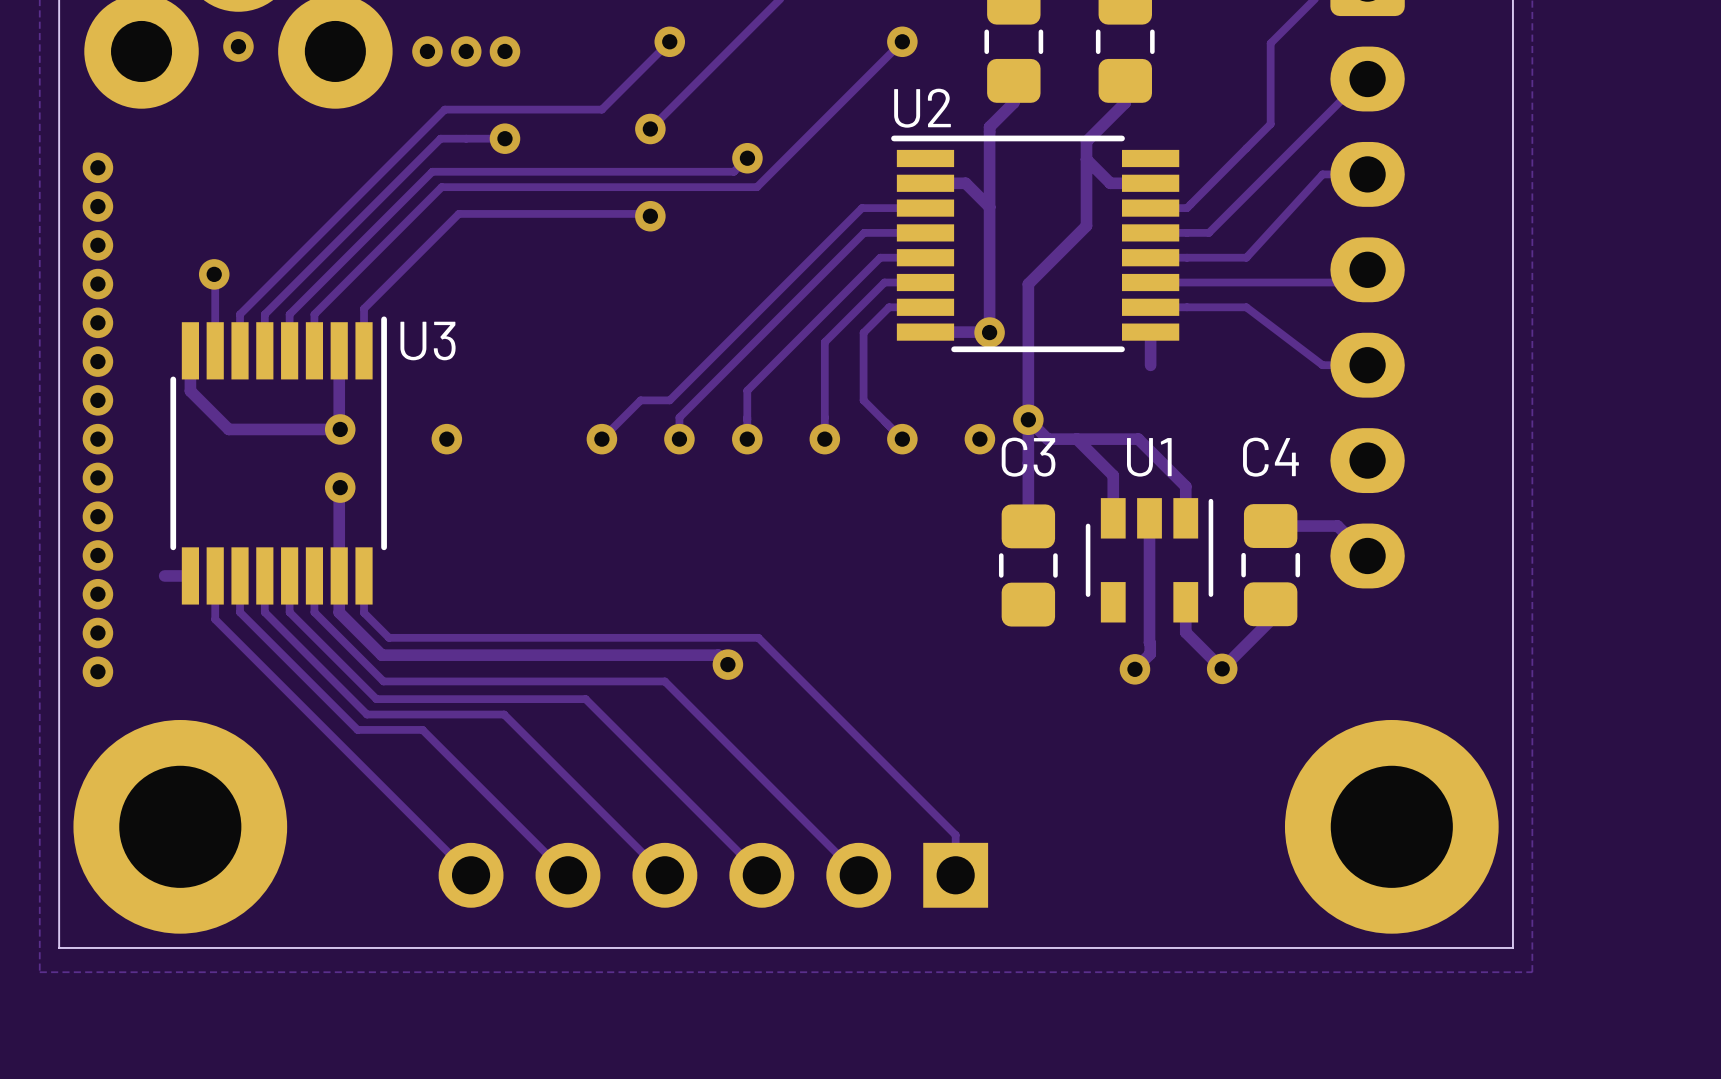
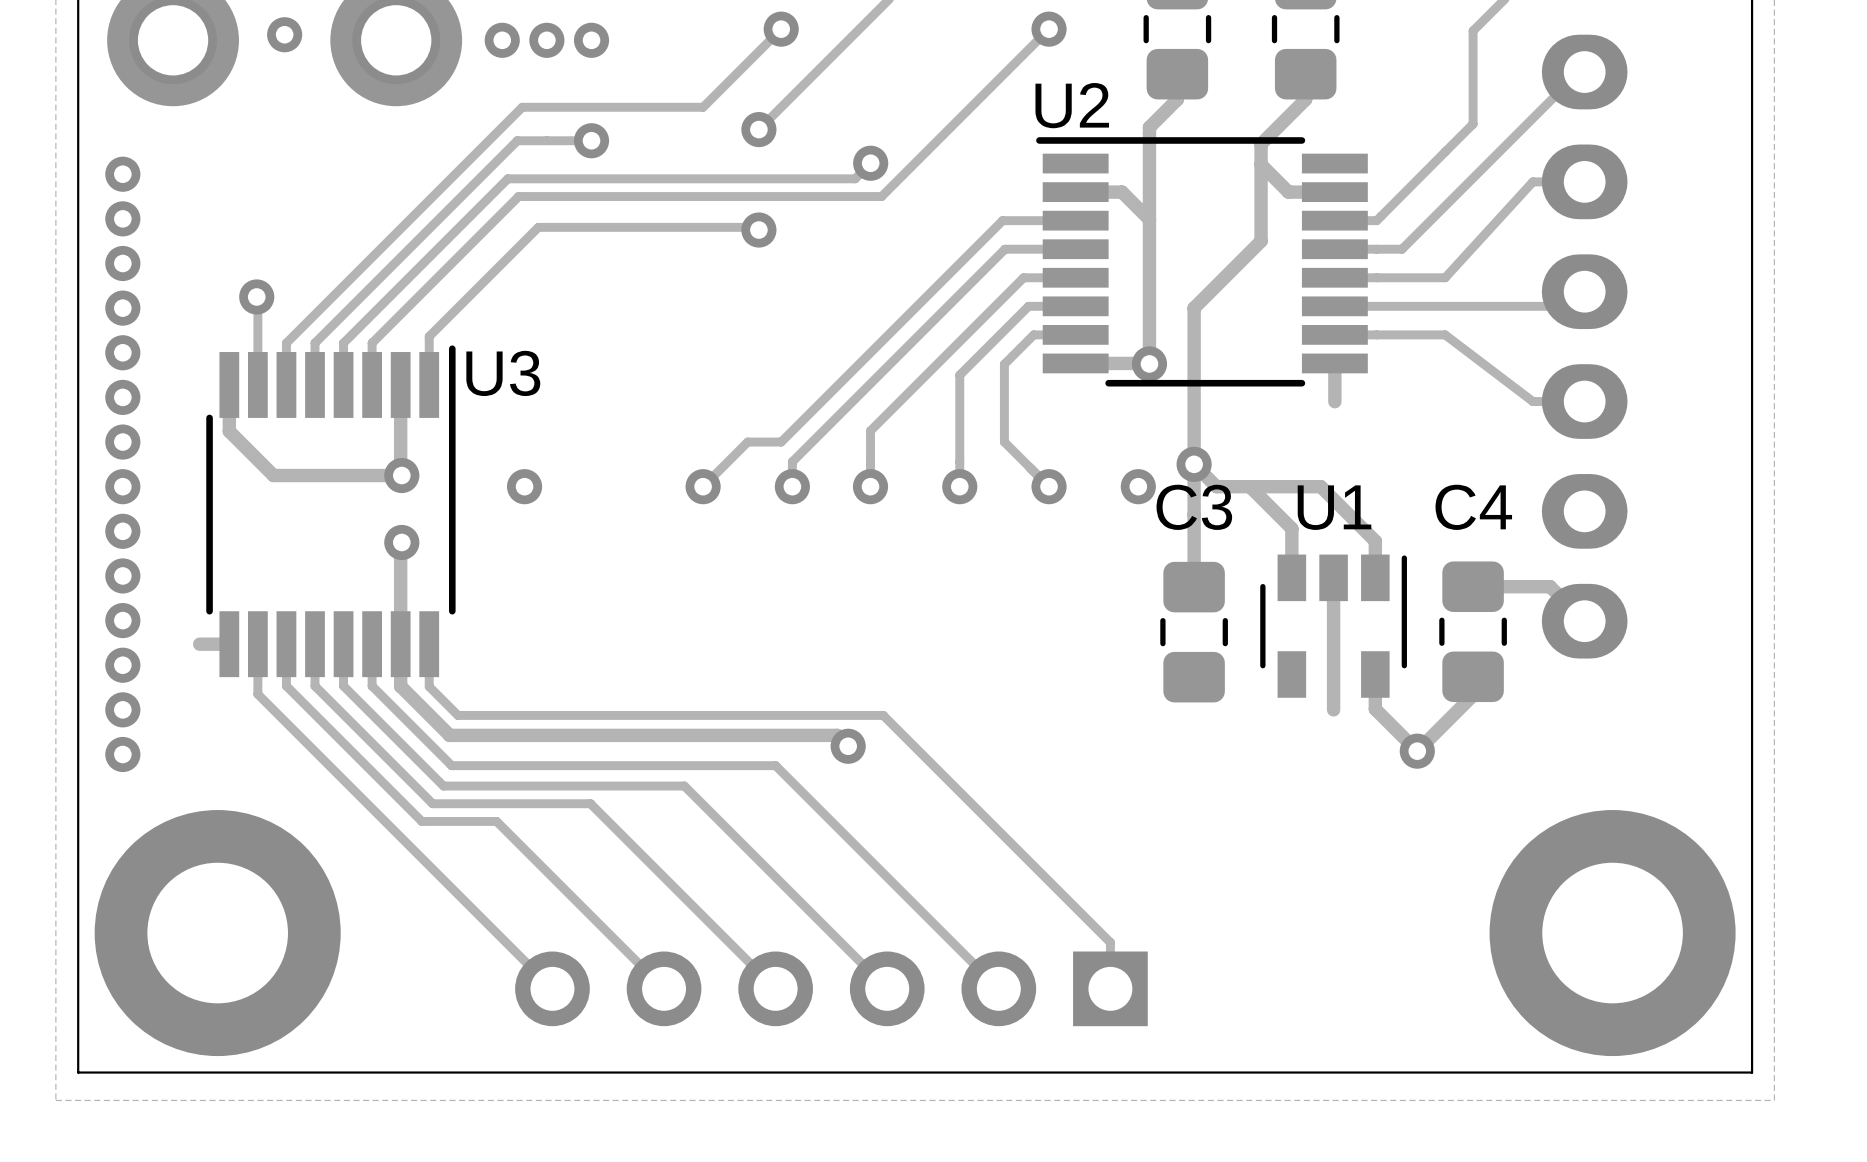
track: (1149, 632) (1150, 654) (1134, 669) -> none
via: (1134, 669) -> none

